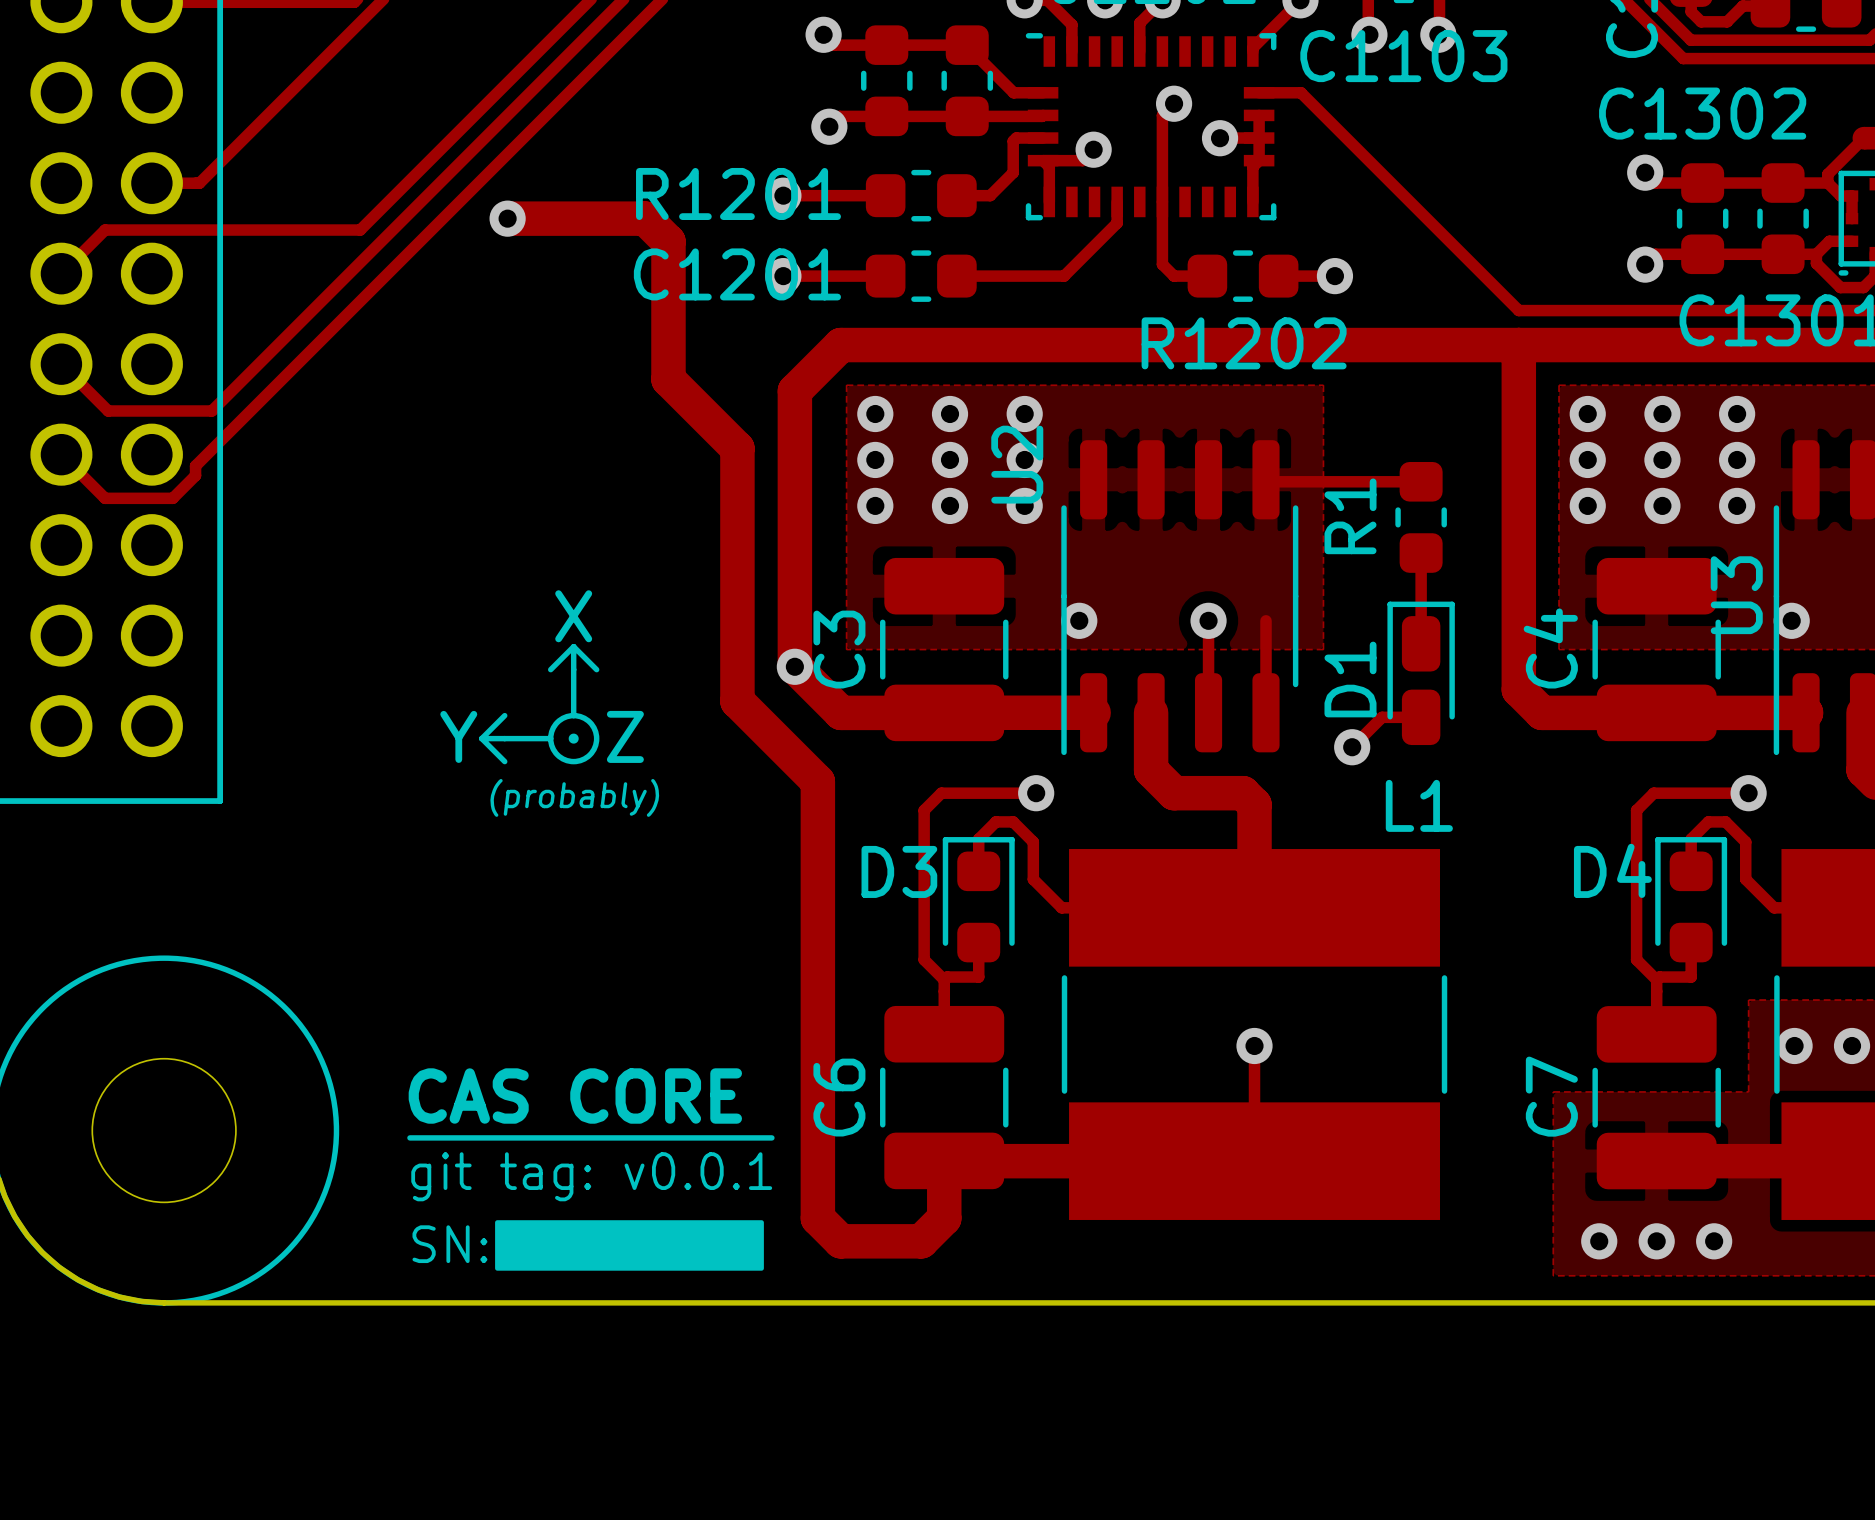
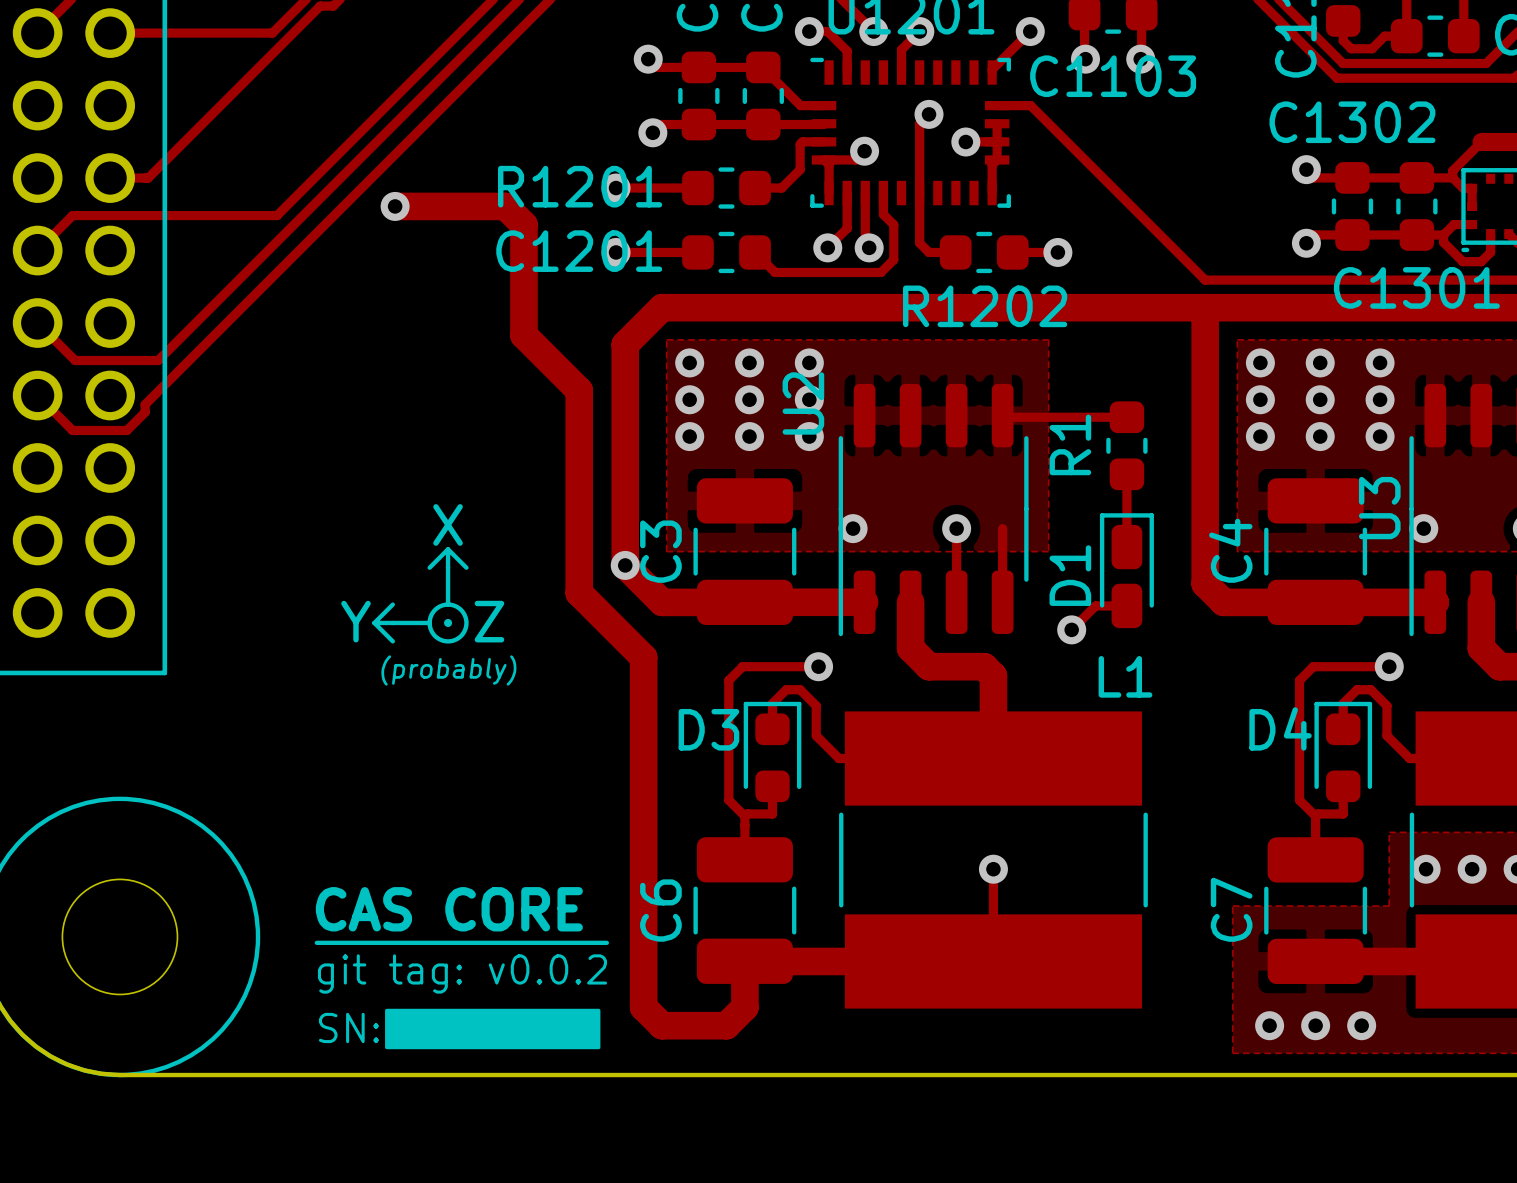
track: none -> (847, 193) (847, 228) (827, 247)
track: none -> (865, 193) (865, 243) (869, 247)
track: (1117, 223) (1064, 276) (956, 276) -> (883, 209) (883, 214) (893, 224) (893, 259) (881, 272) (775, 272) (755, 252)
via: none -> (827, 247)
via: none -> (869, 247)
text: git tag: v0.0.1 (591, 1176) -> git tag: v0.0.2 (462, 973)

